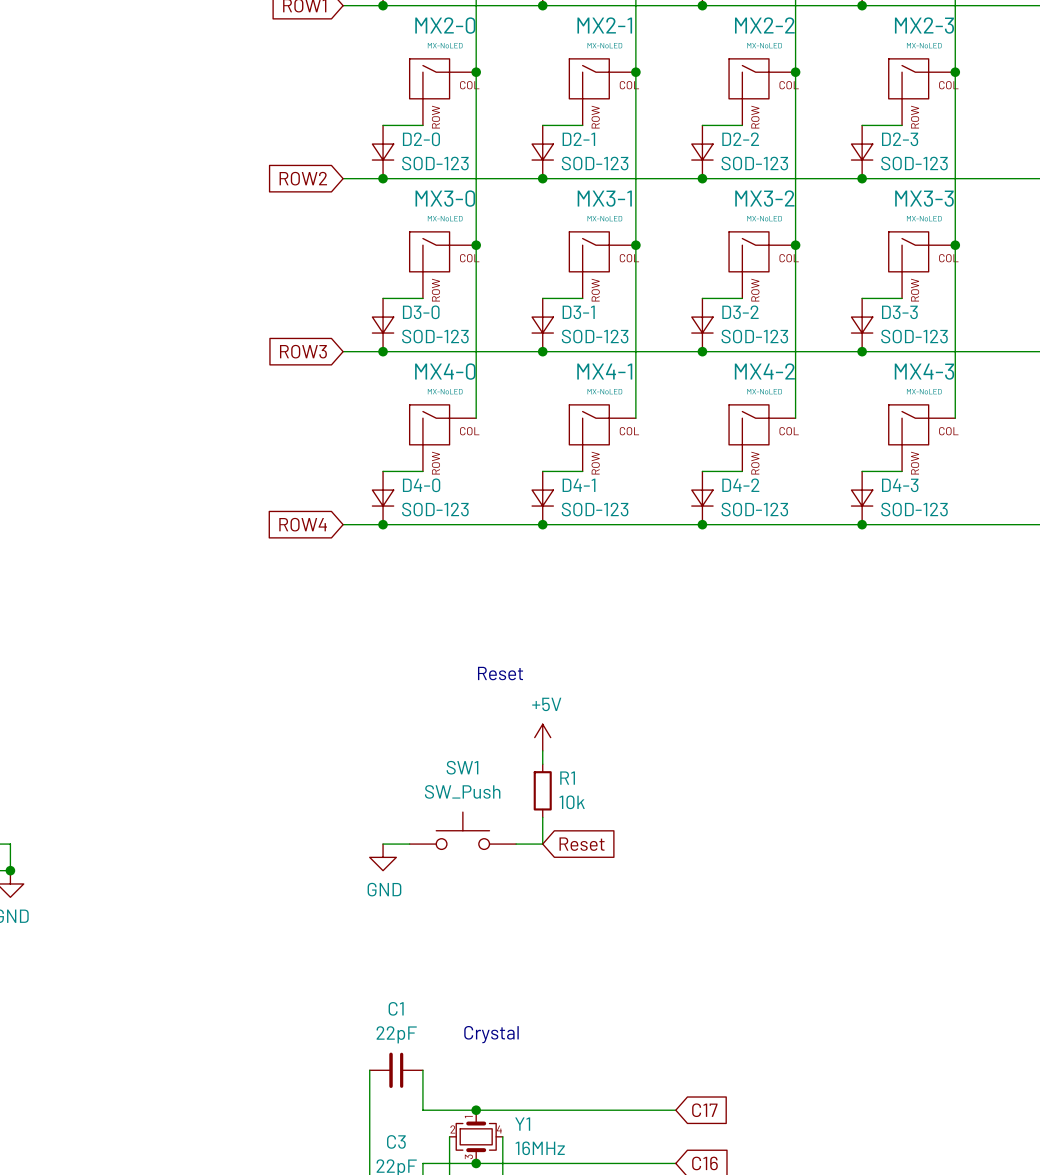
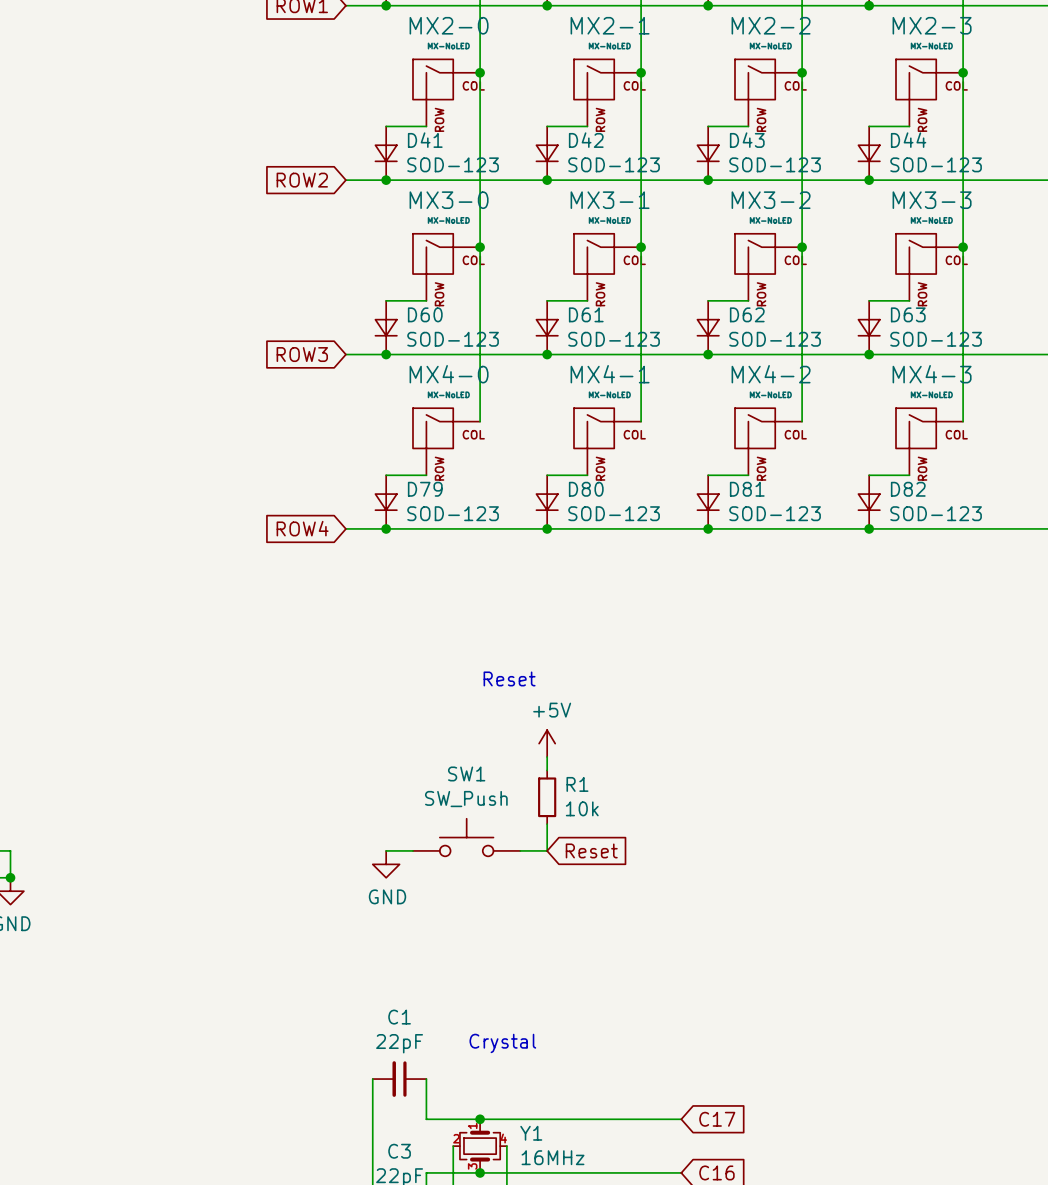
D2-0 name: D2-0 (421, 139) -> D41 (425, 140)
D2-1 name: D2-1 (578, 139) -> D42 (586, 140)
D2-2 name: D2-2 (740, 139) -> D43 (747, 140)
D2-3 name: D2-3 (900, 139) -> D44 (908, 140)
D3-0 name: D3-0 (421, 312) -> D60 (425, 314)
D3-1 name: D3-1 (578, 312) -> D61 (586, 314)
D3-2 name: D3-2 (740, 312) -> D62 (747, 314)
D3-3 name: D3-3 (899, 312) -> D63 (908, 314)
D4-0 name: D4-0 (421, 485) -> D79 (425, 489)
D4-1 name: D4-1 (579, 485) -> D80 (586, 489)
D4-2 name: D4-2 (740, 485) -> D81 (747, 489)
D4-3 name: D4-3 (900, 485) -> D82 (908, 489)

